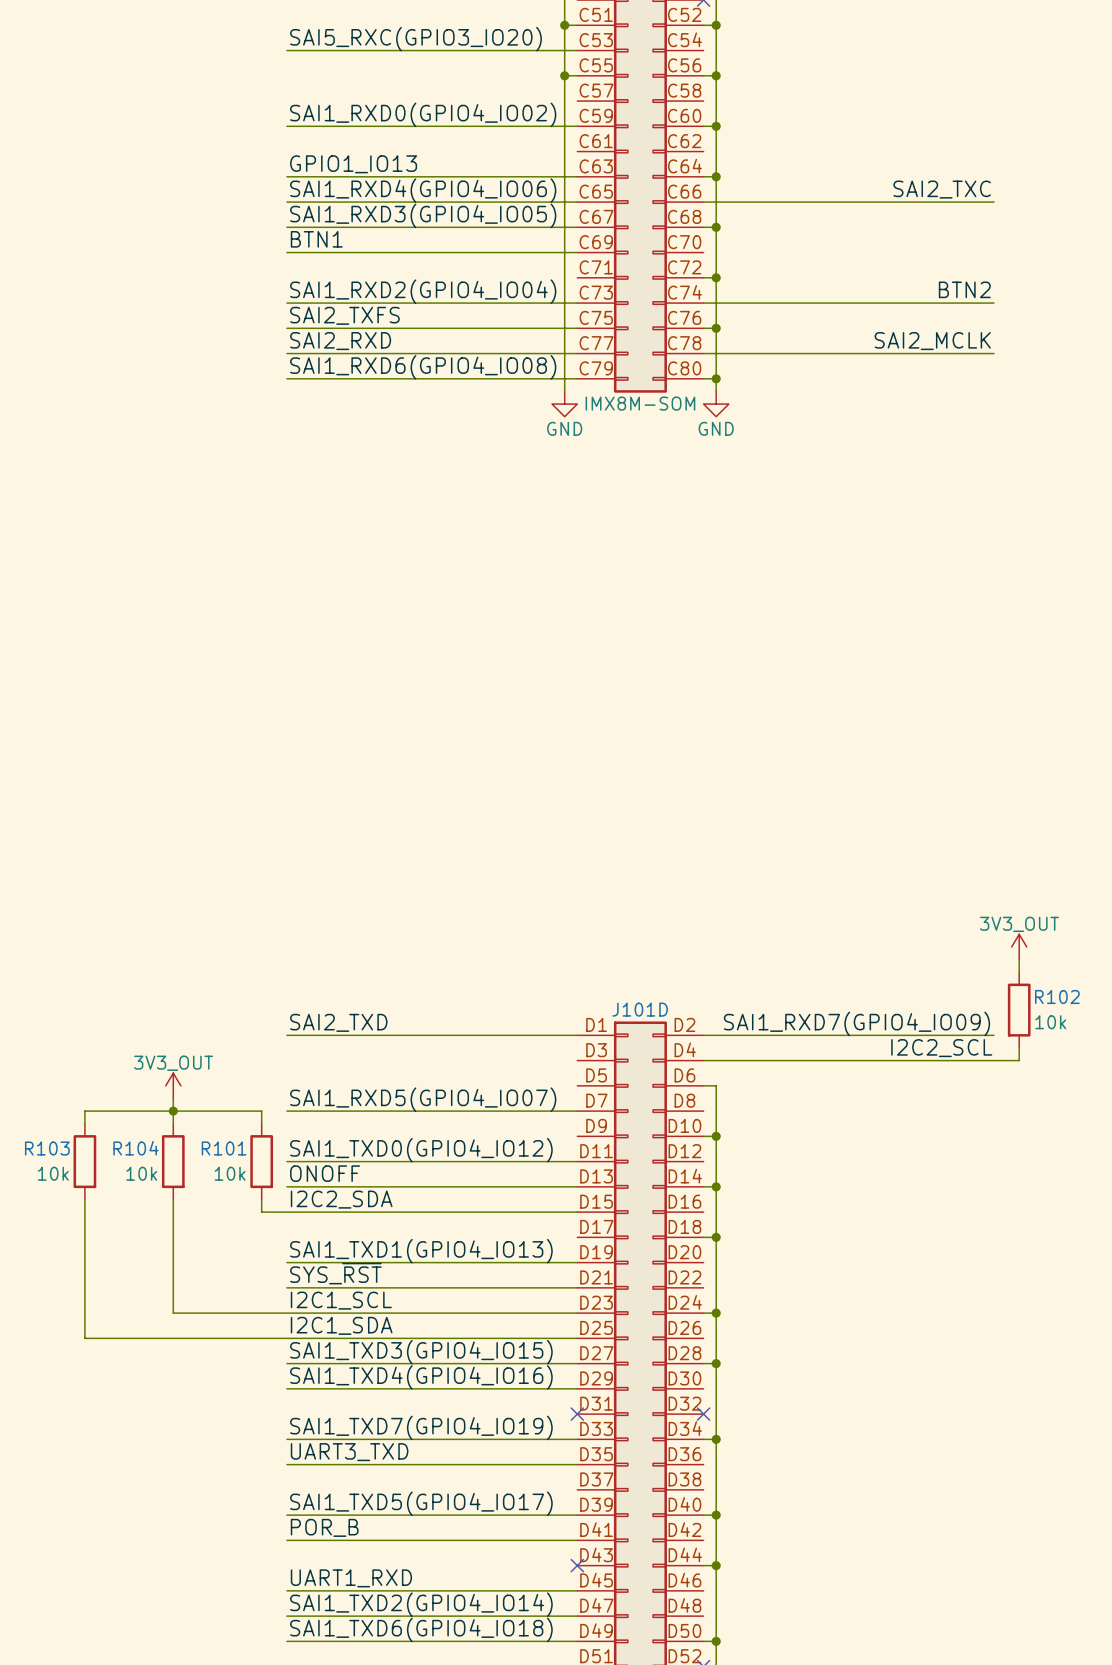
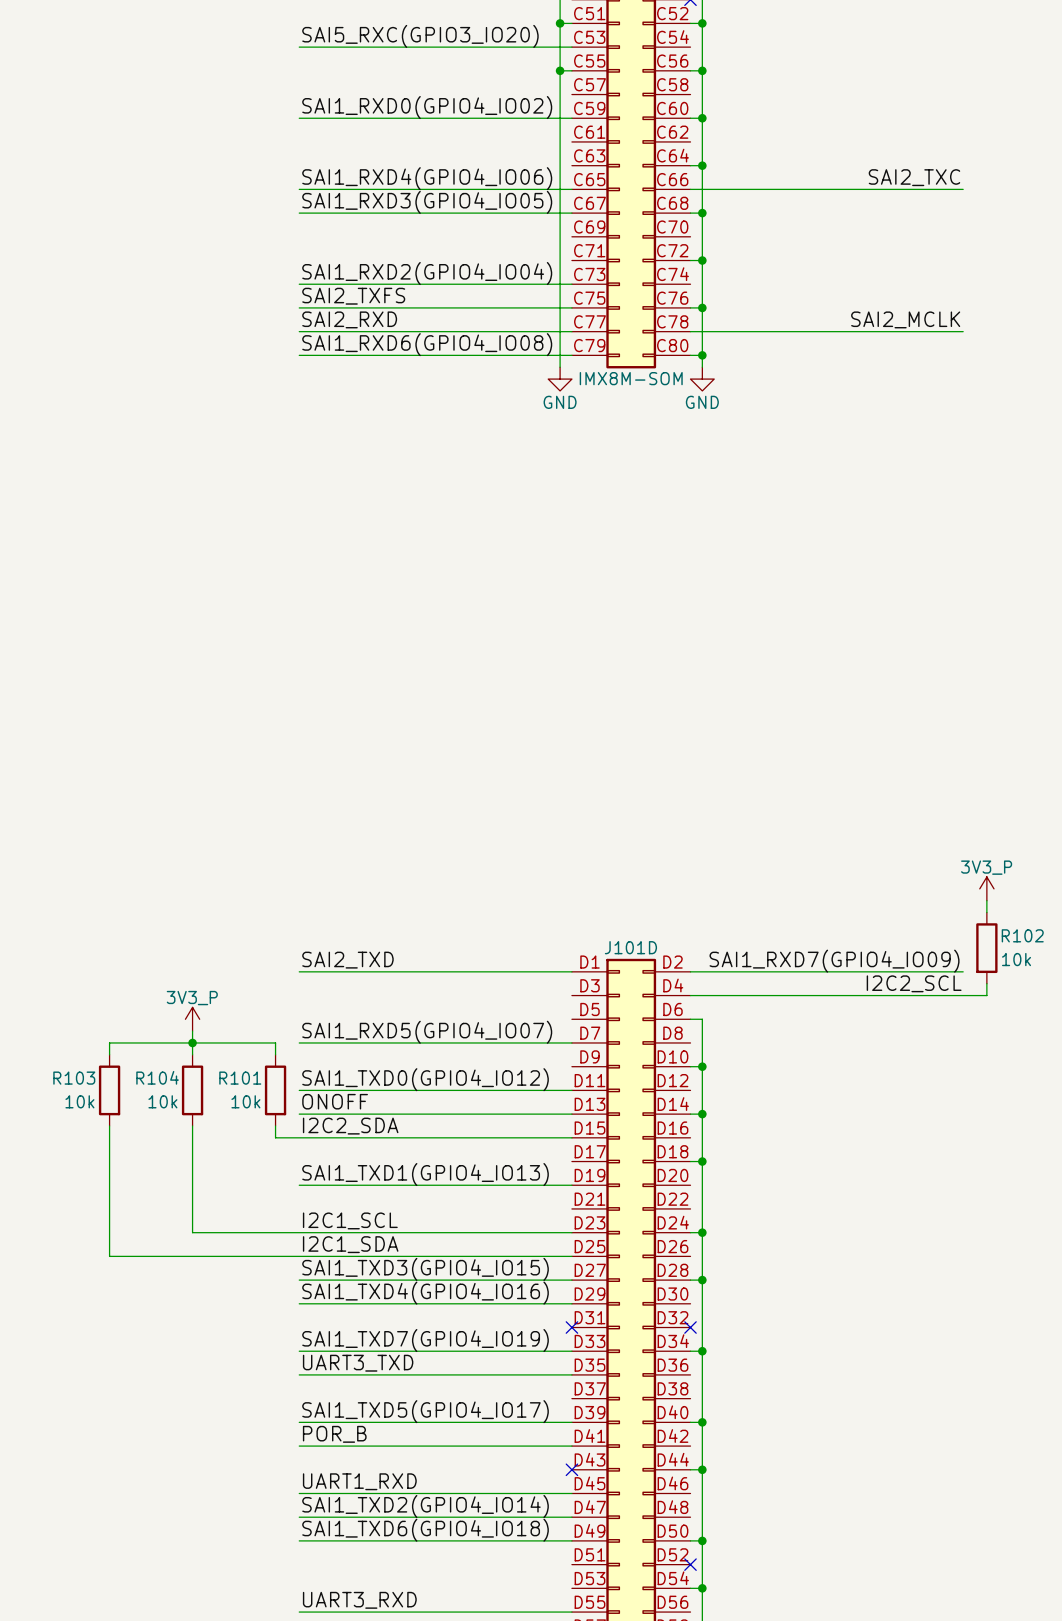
label: GPIO1_IO13 (353, 164) -> none
wire: (286, 176) (577, 176) -> none
label: BTN1 (316, 239) -> none
wire: (286, 252) (577, 252) -> none
label: BTN2 (964, 289) -> none
wire: (703, 303) (993, 303) -> none
power symbol: 3V3_OUT (1019, 946) -> 3V3_P (986, 888)
power symbol: 3V3_OUT (173, 1085) -> 3V3_P (192, 1019)
label: SYS_~{RST} (335, 1273) -> none
wire: (286, 1287) (577, 1287) -> none

